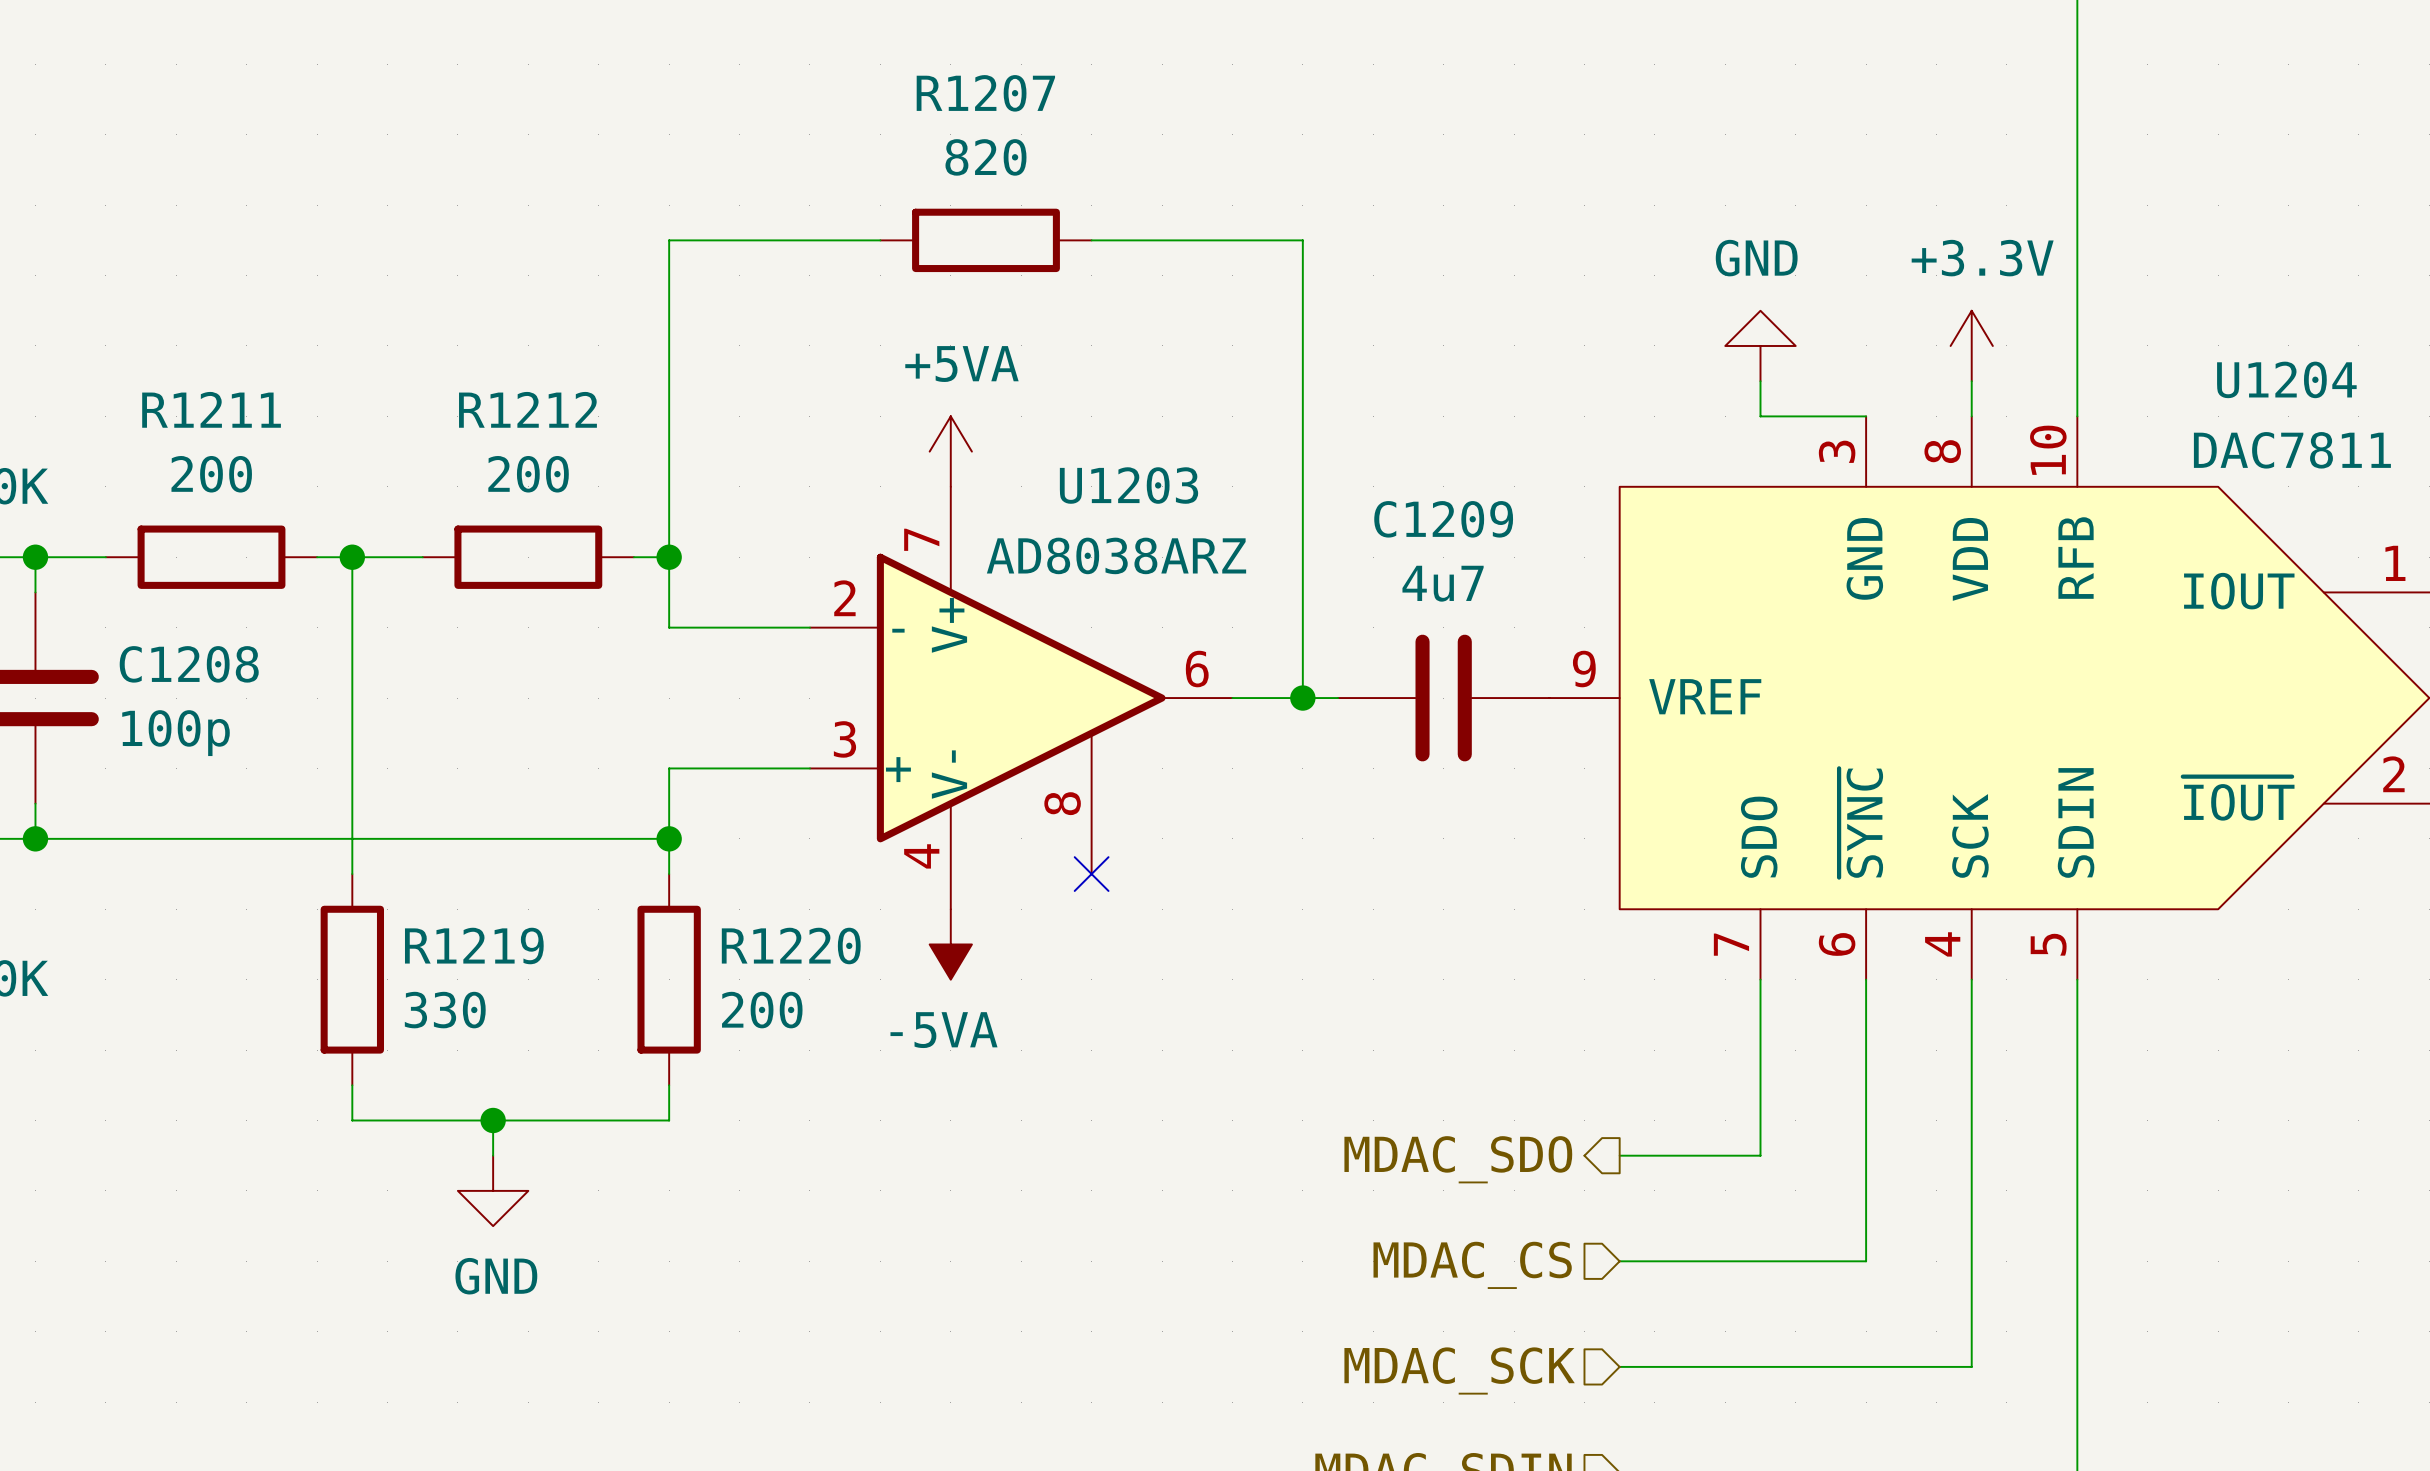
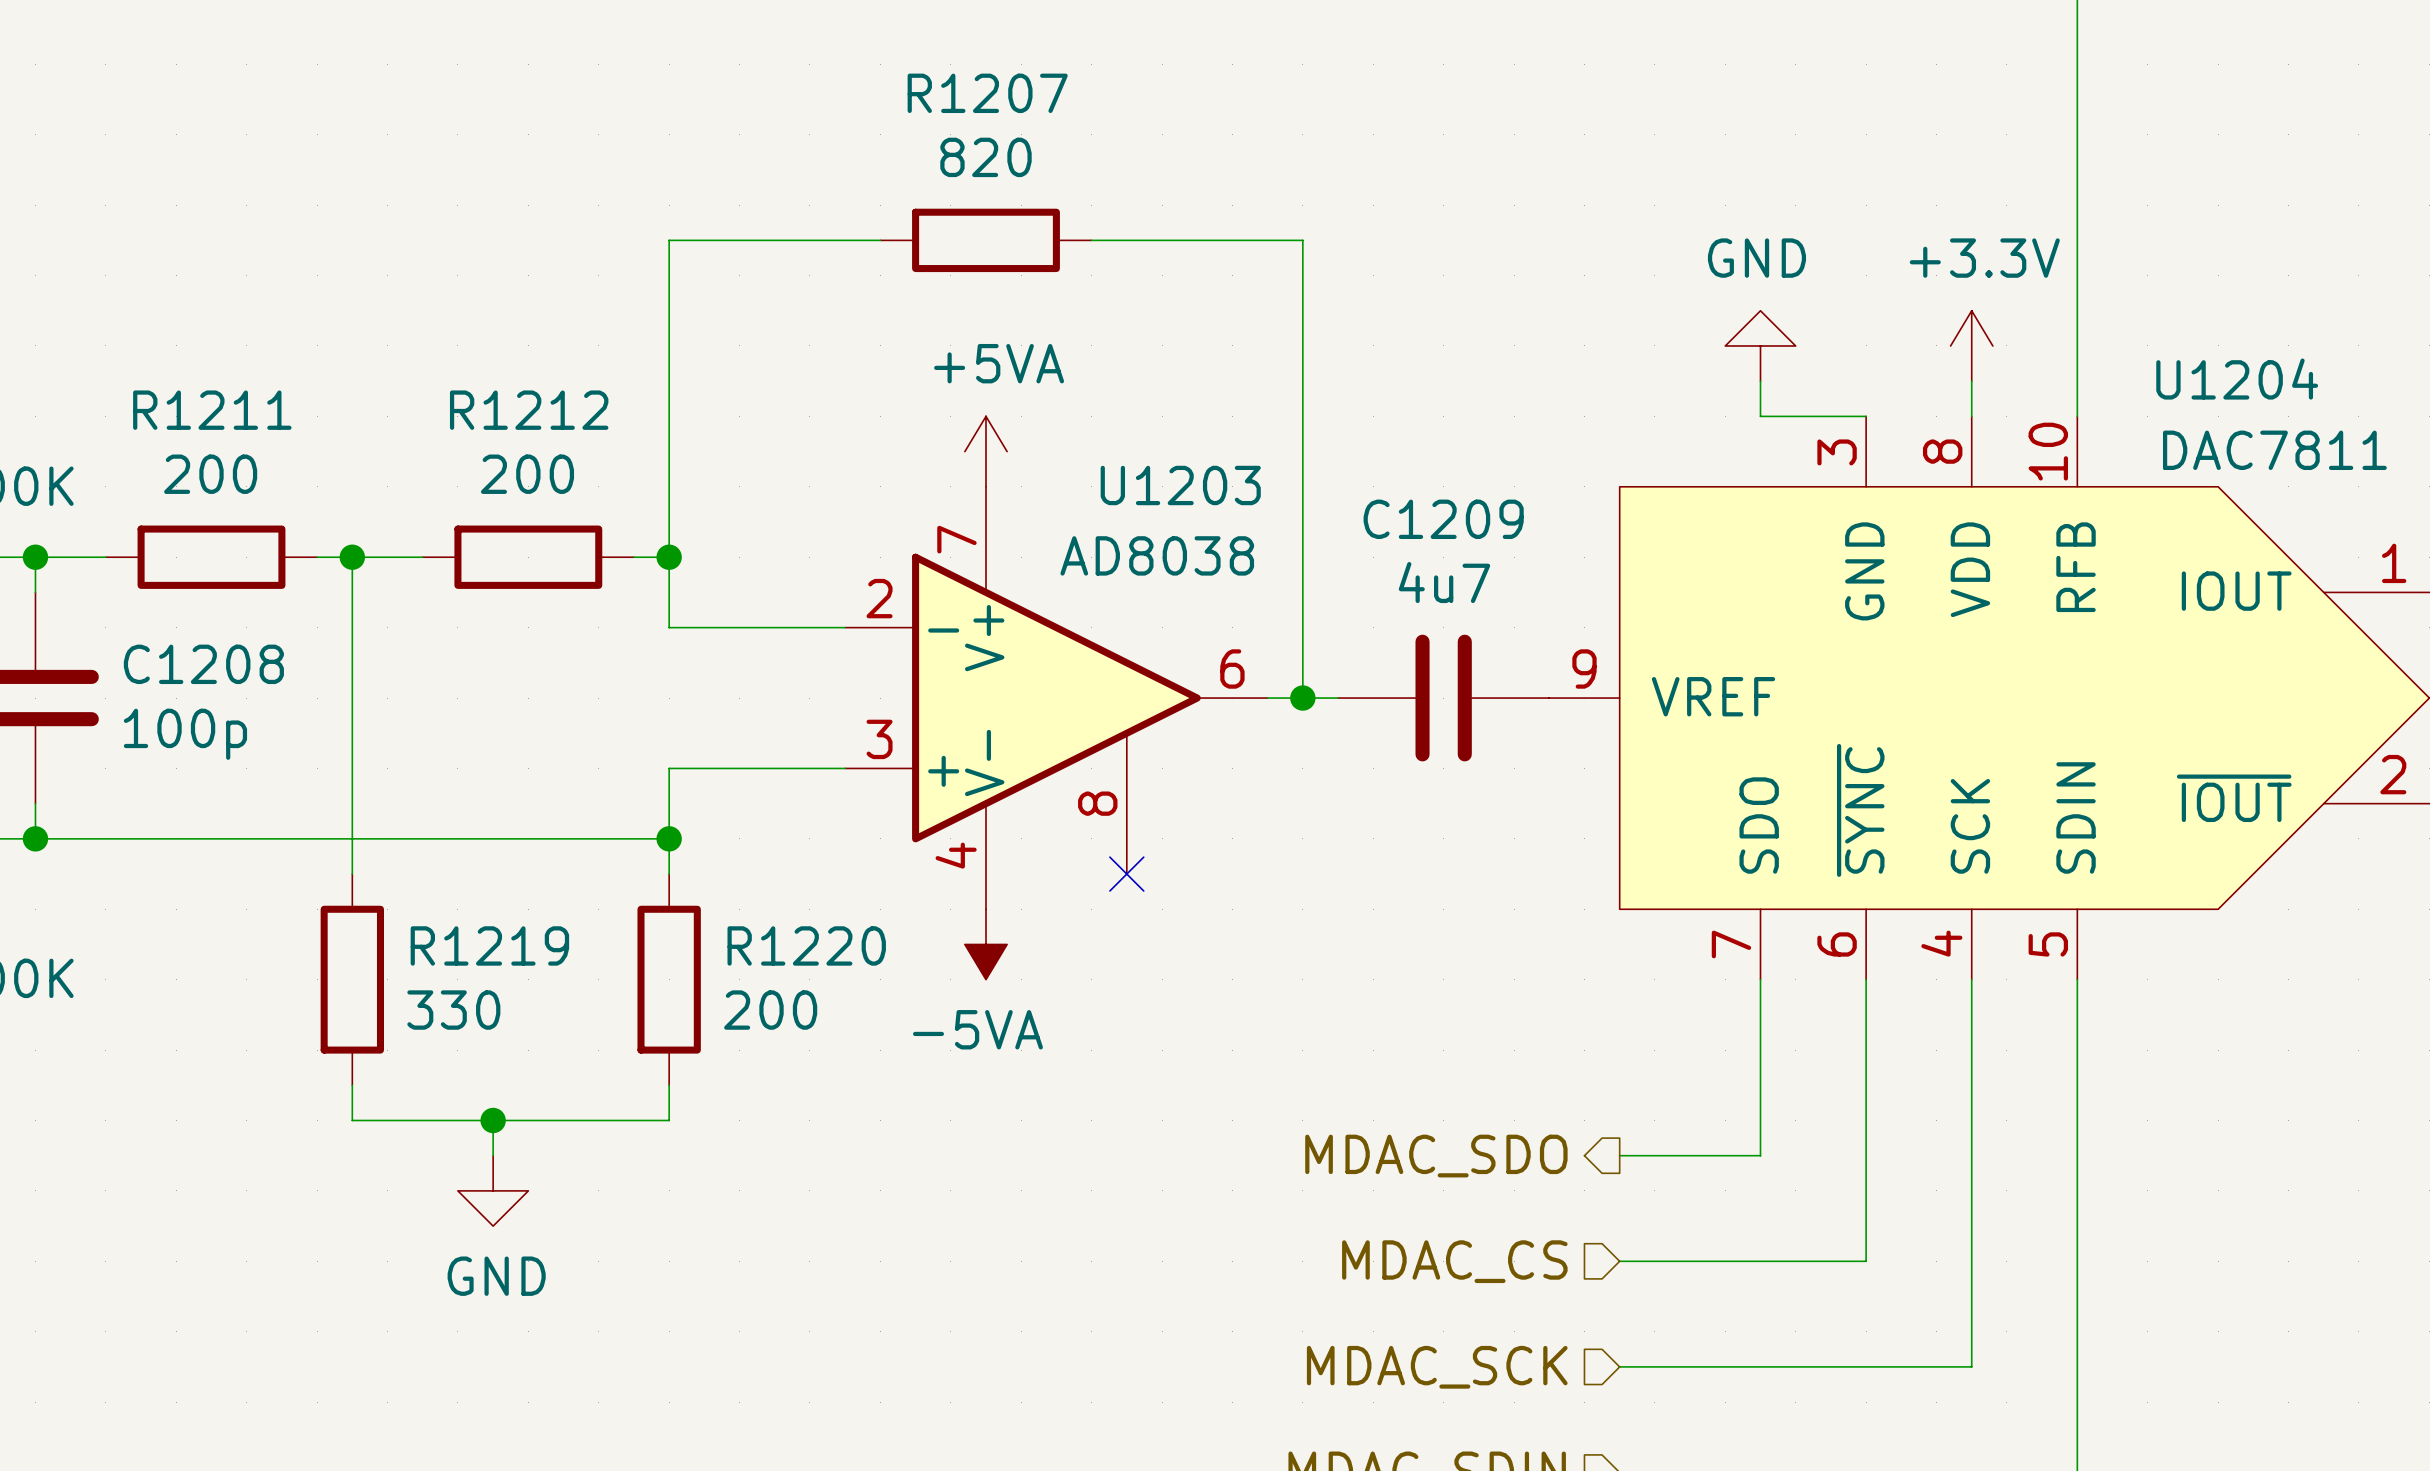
U1204 name position: U1204 (2286, 379) -> U1204 (2237, 379)
power symbol position: +5VA (950, 451) -> +5VA (986, 451)
U1203 value: AD8038ARZ (1116, 555) -> AD8038 (1157, 555)
U1203 position: (1021, 698) -> (1056, 698)
no-connect mark position: (1091, 874) -> (1126, 874)
power symbol position: -5VA (950, 944) -> -5VA (986, 944)

